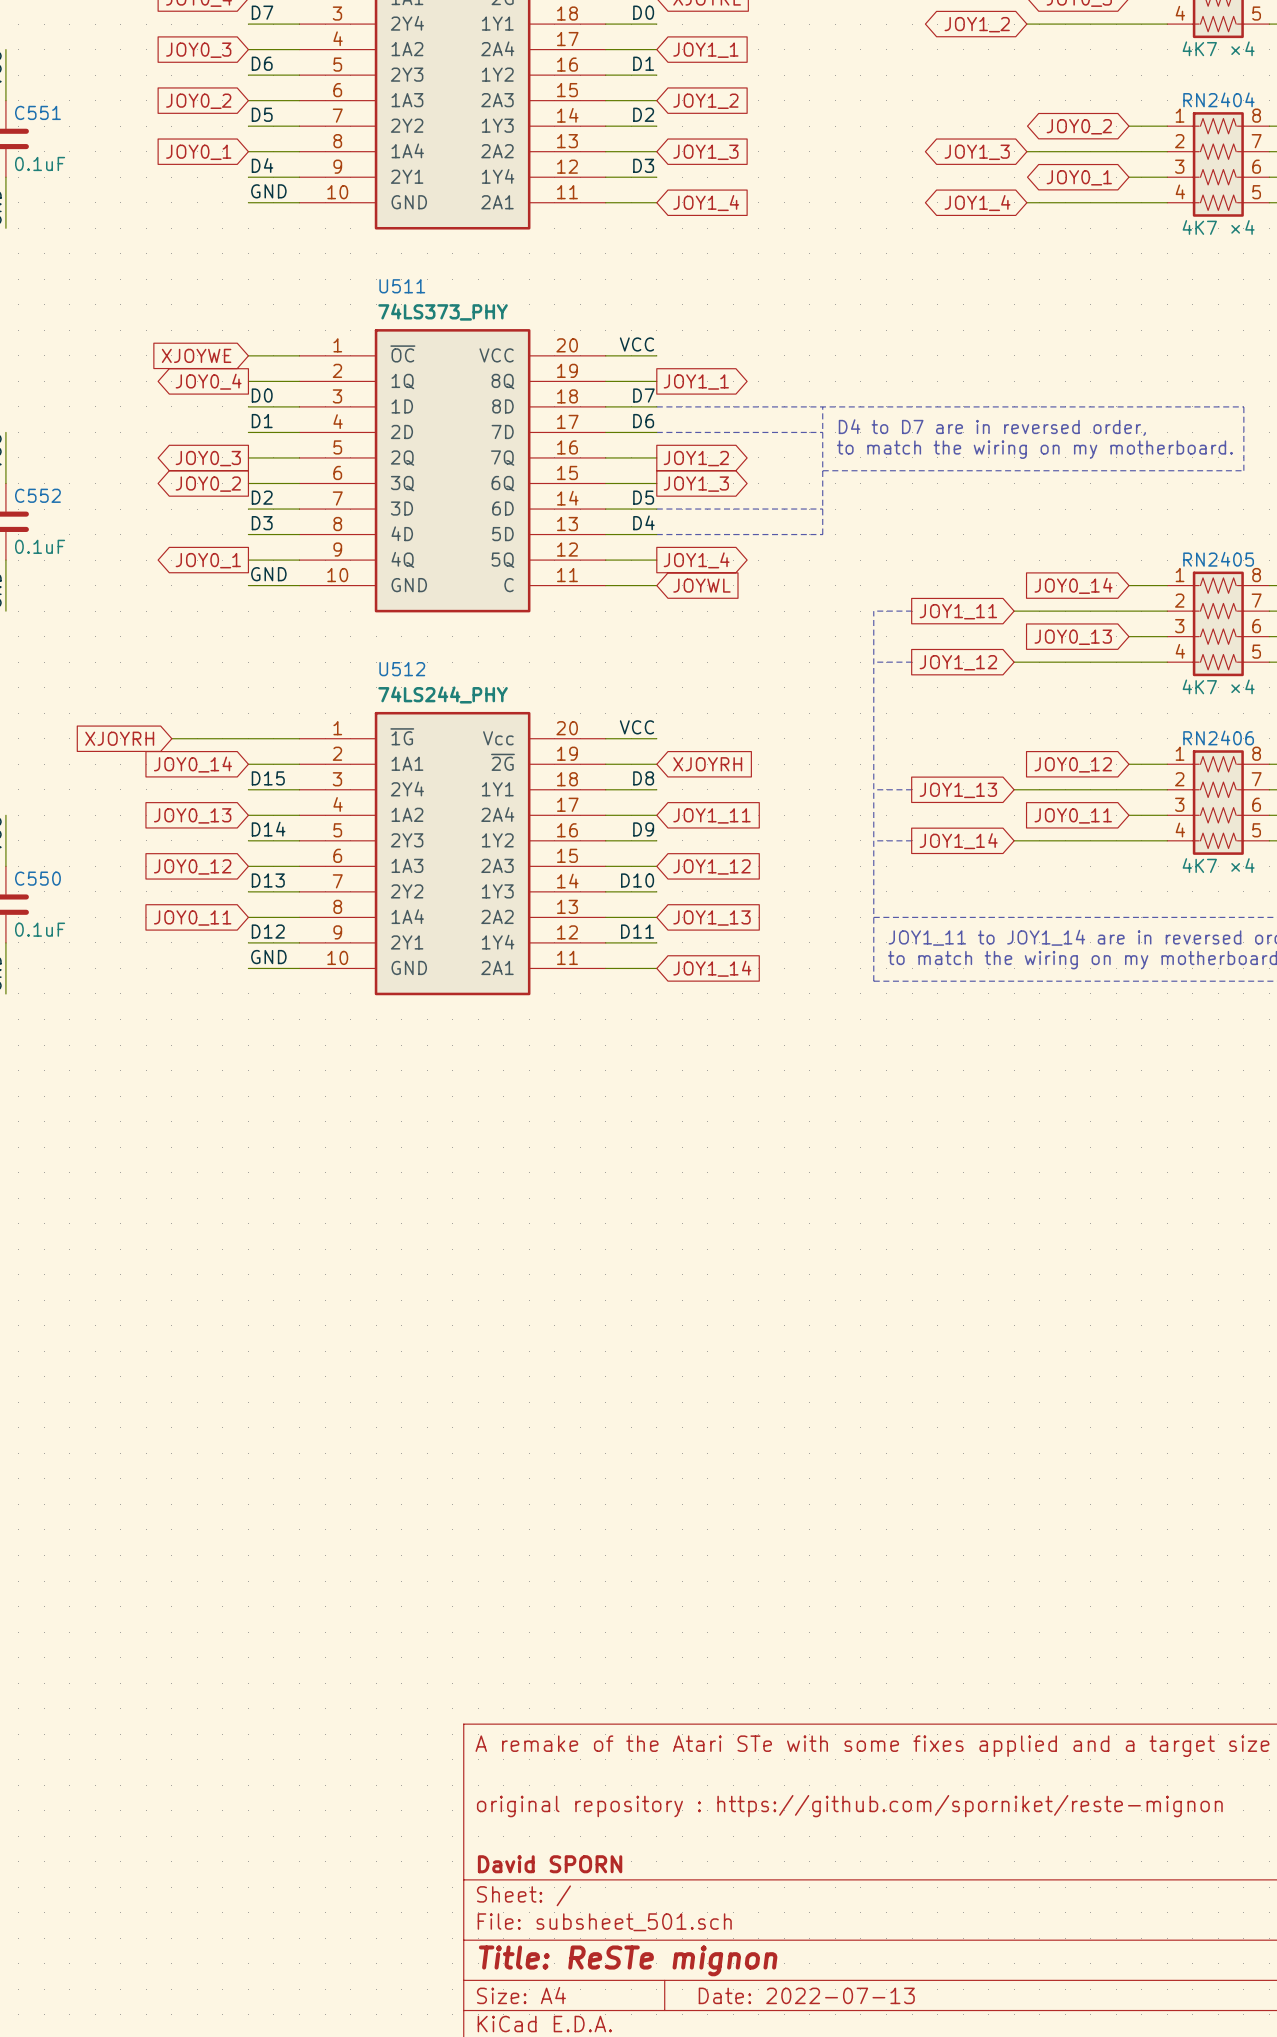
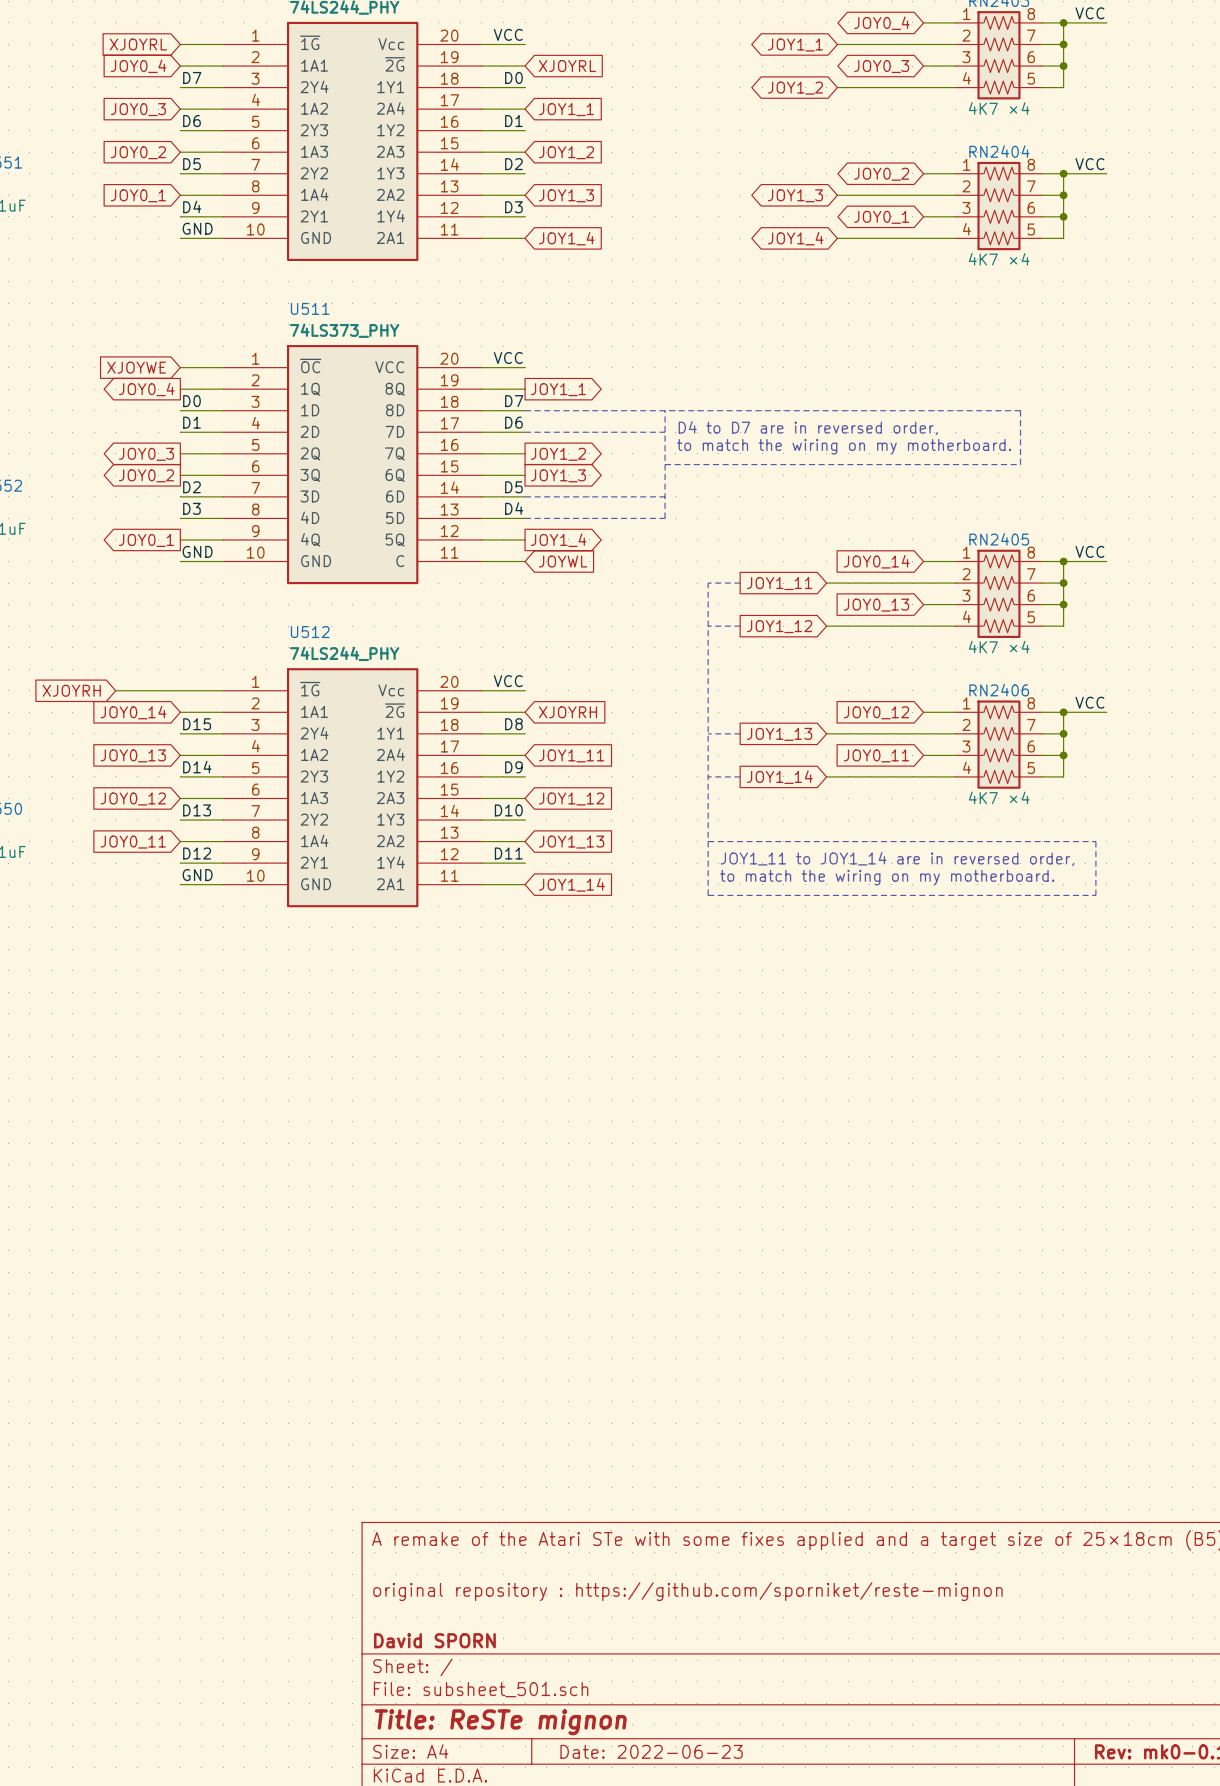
title block: Date: 2022-07-13 (806, 1995) -> Date: 2022-06-23 (651, 1751)

